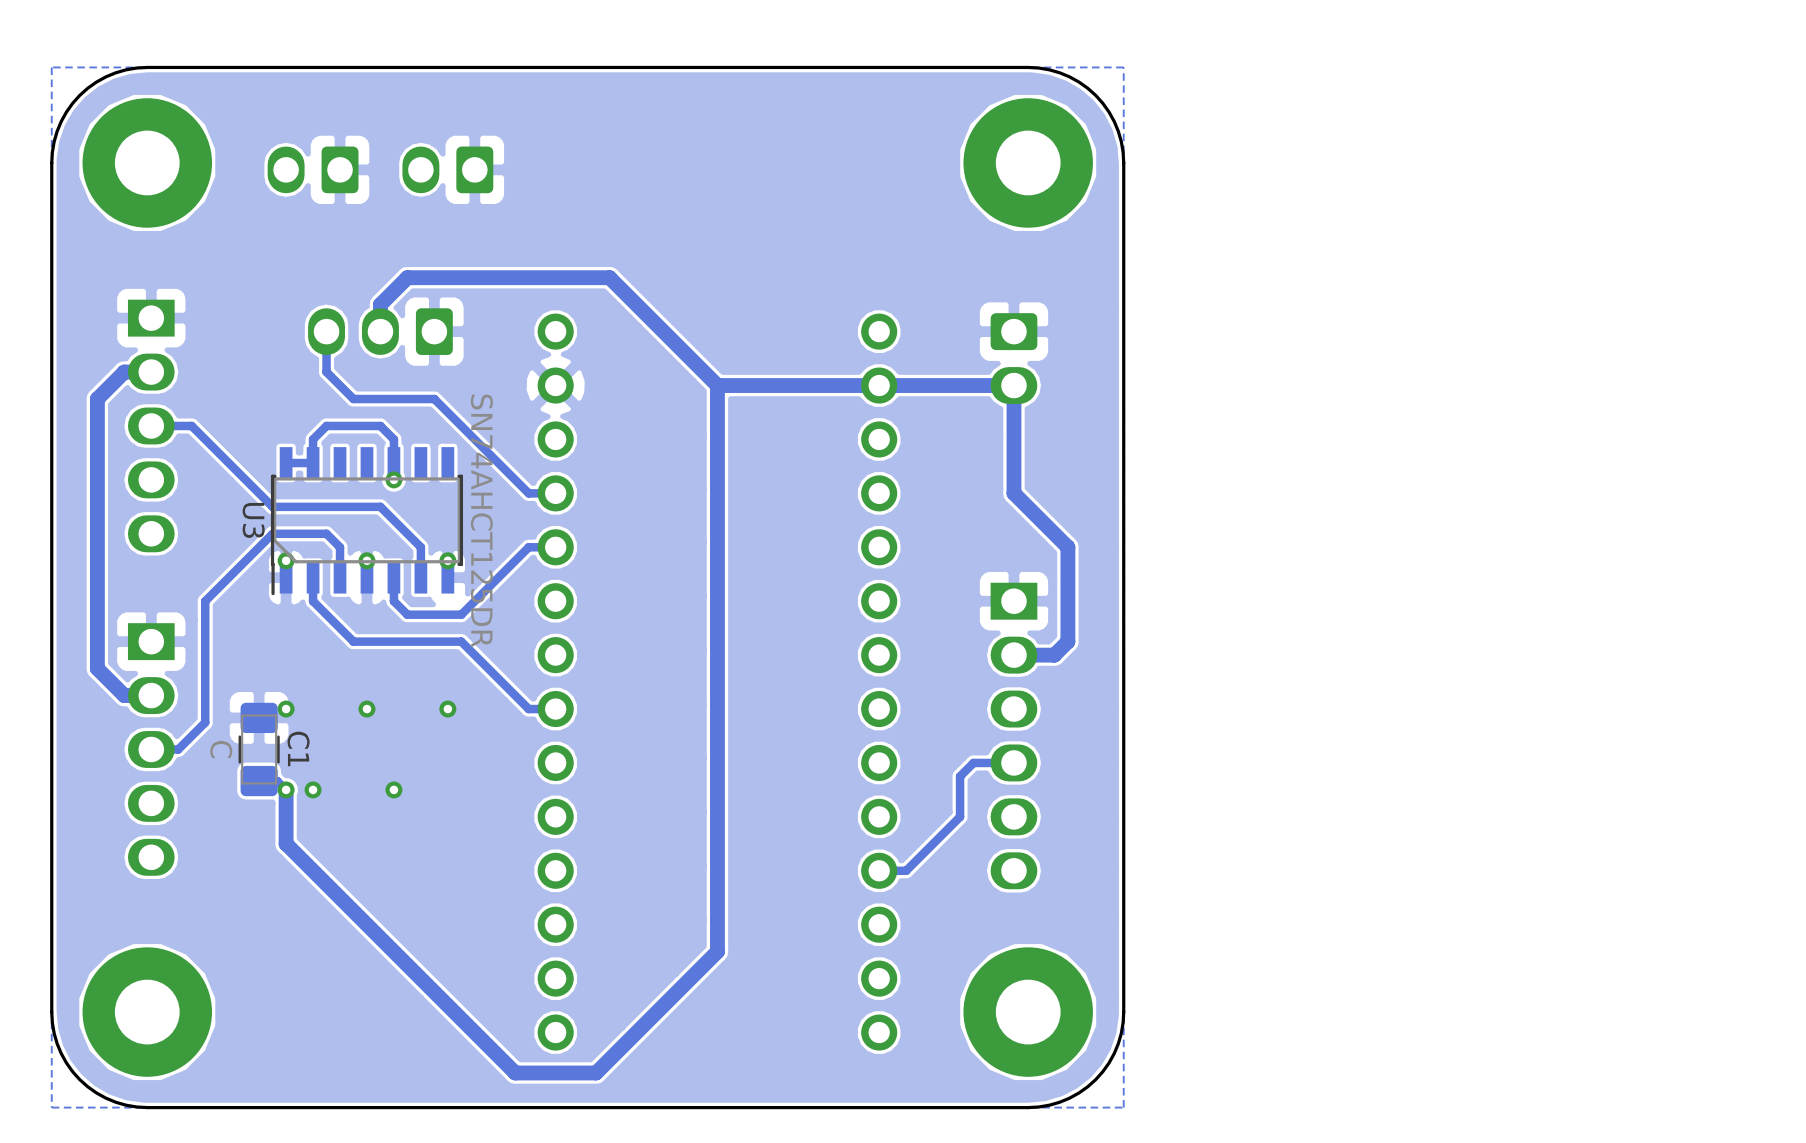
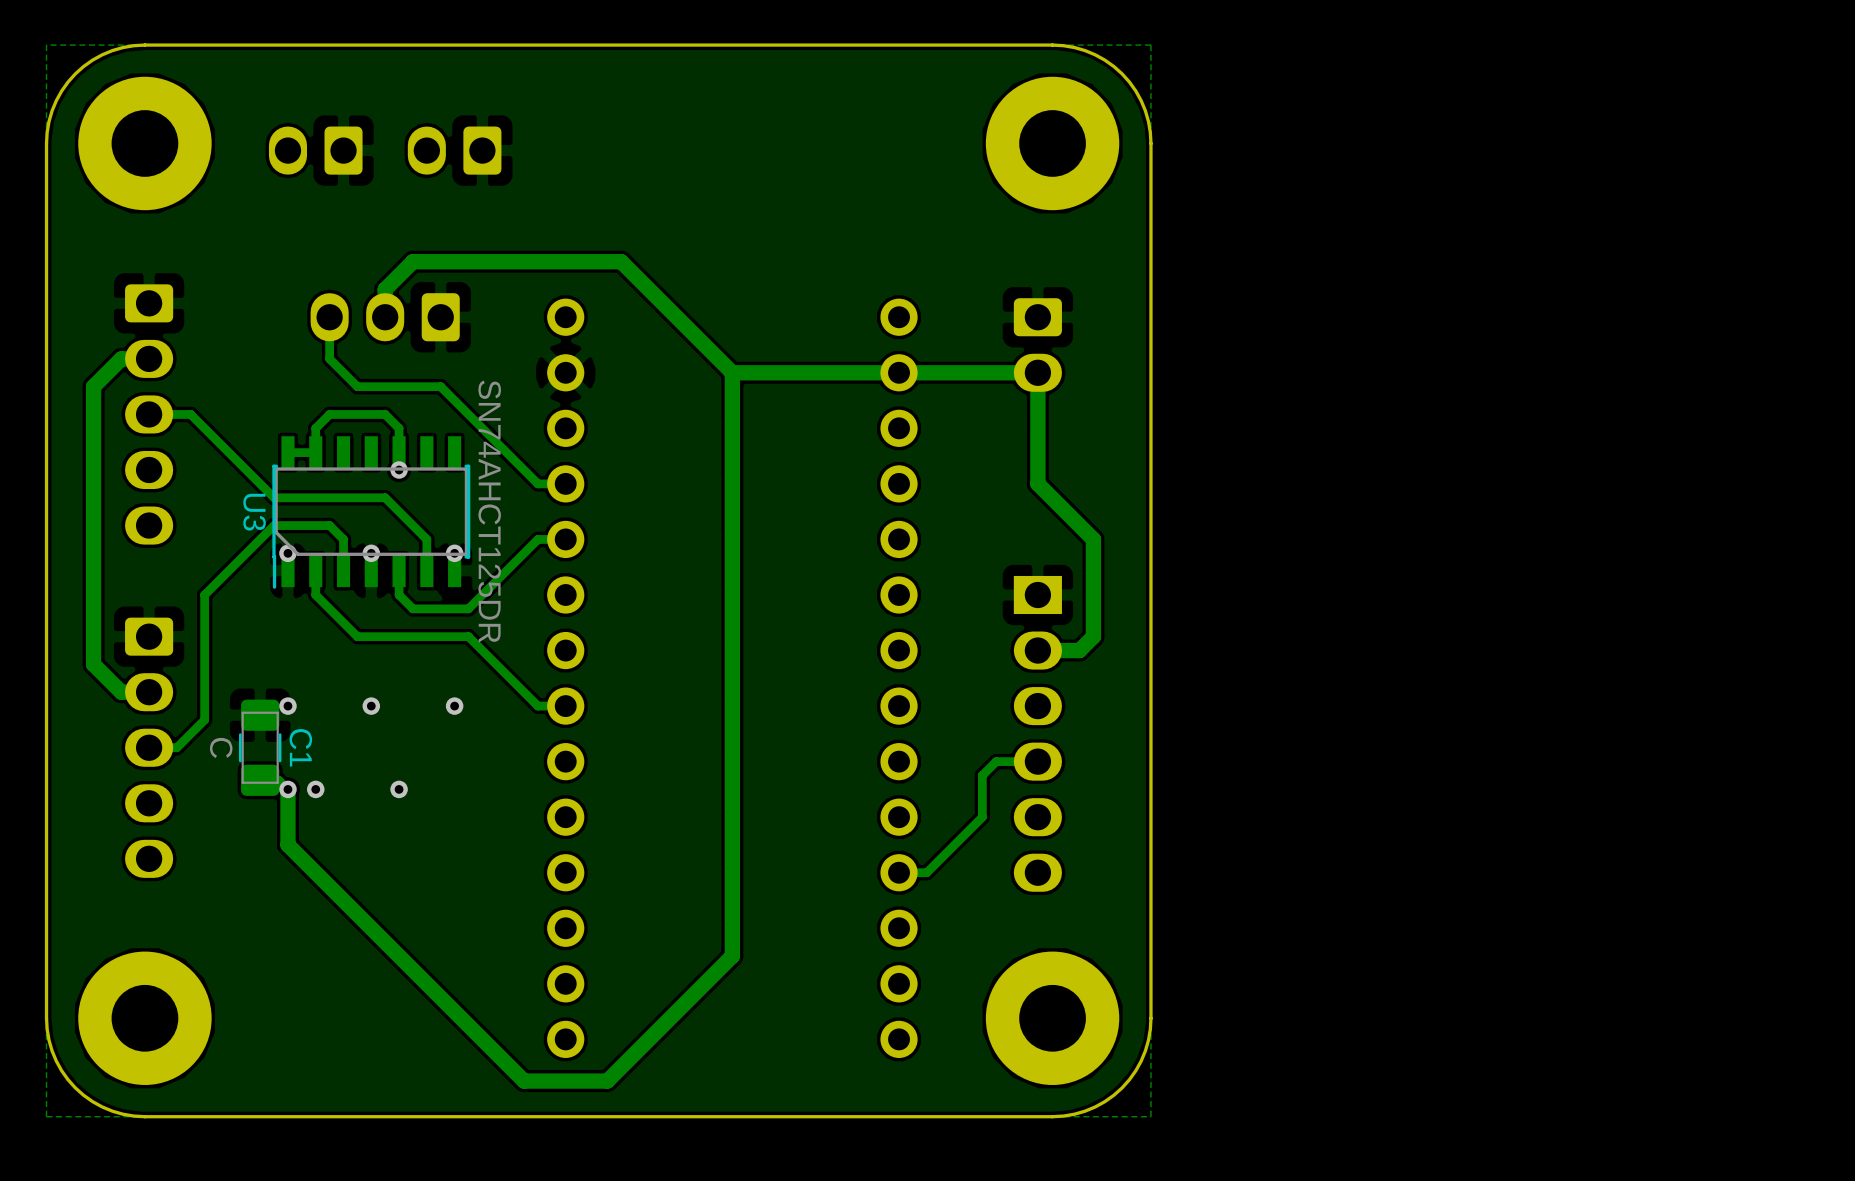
part footprint: [127, 299, 175, 553] -> [125, 284, 174, 545]
part footprint: [127, 623, 175, 876] -> [125, 617, 174, 878]

